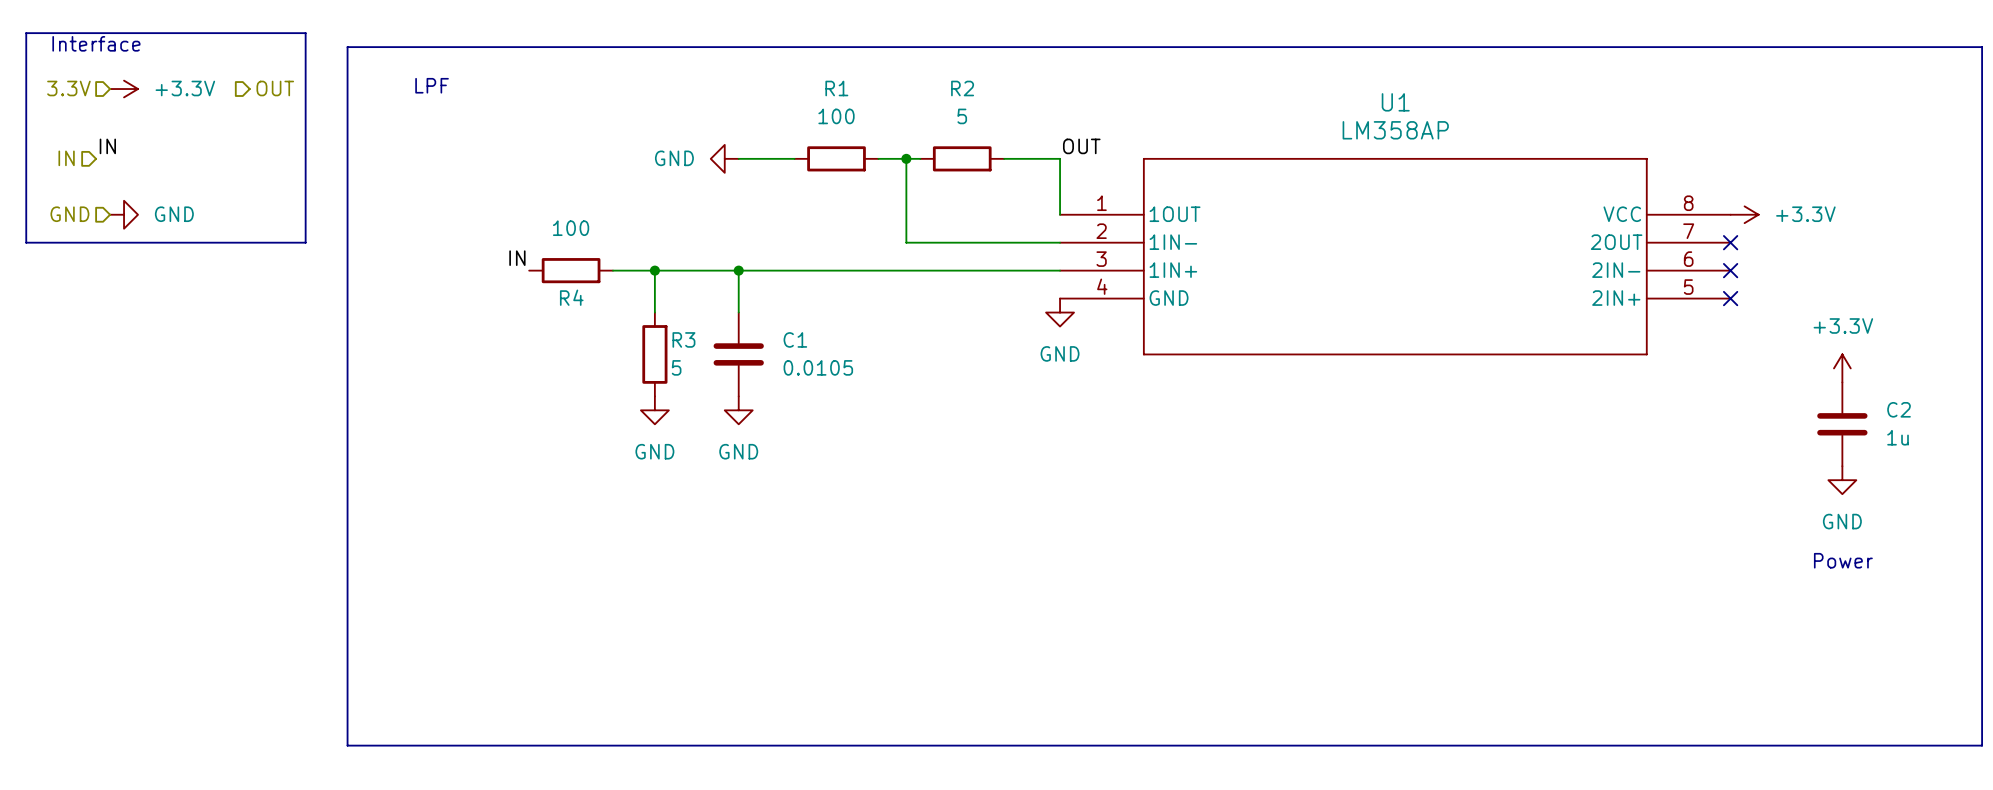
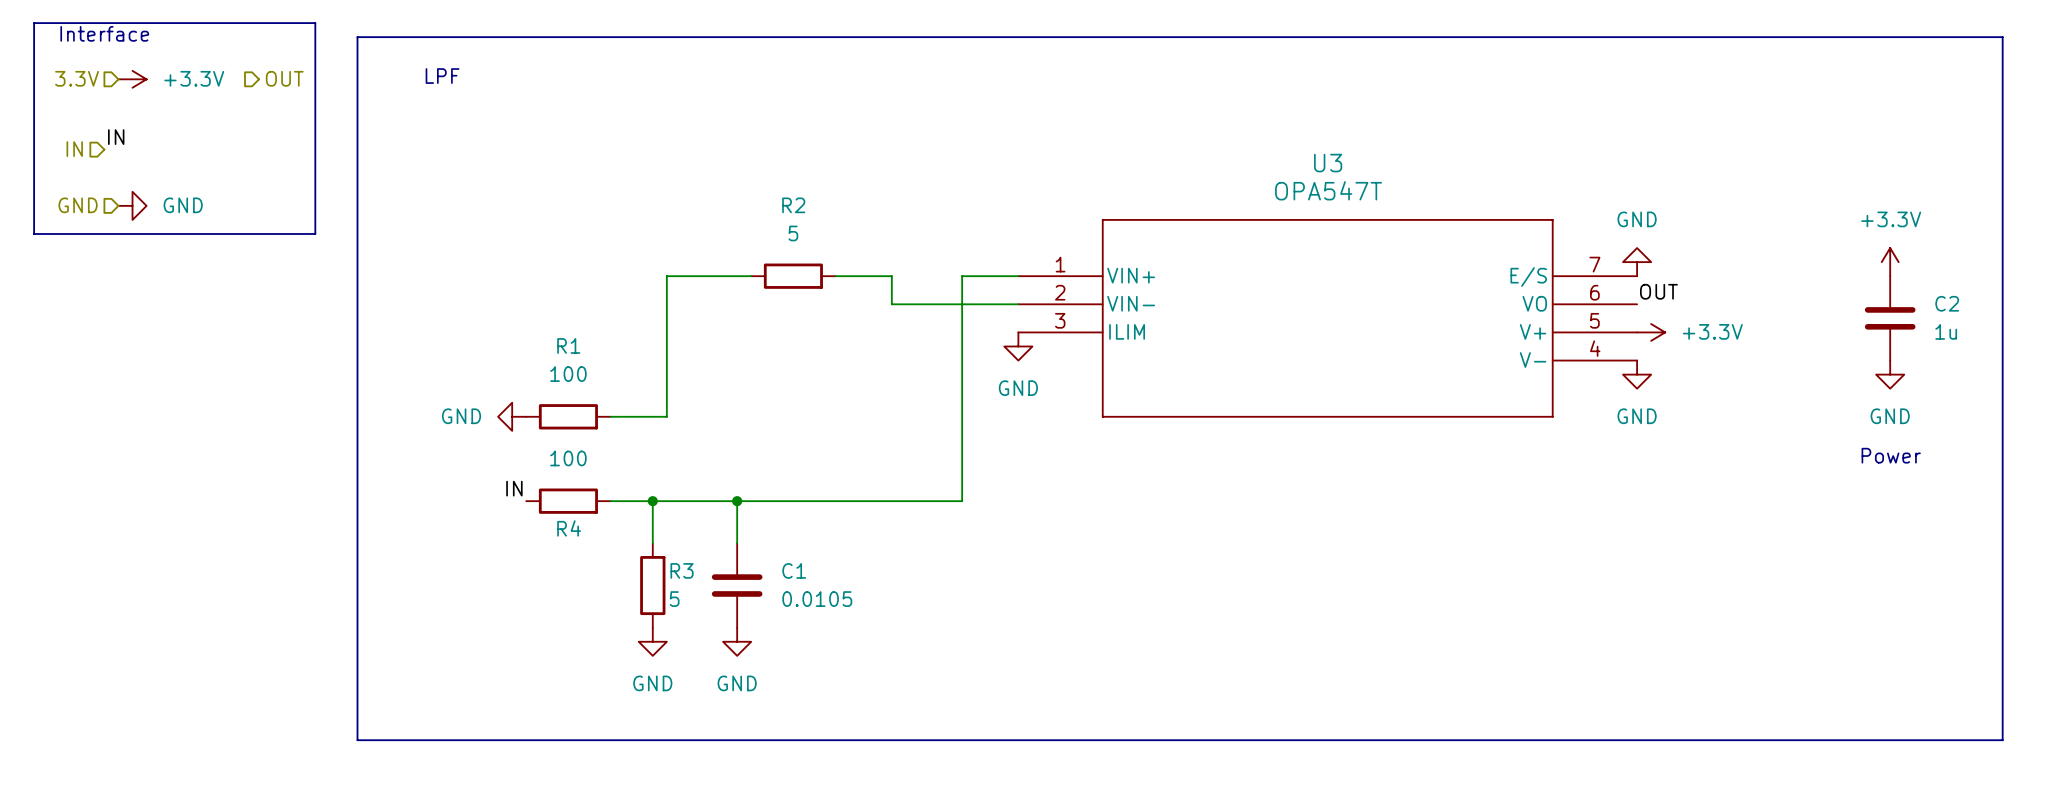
label: OUT (1081, 146) -> none
power symbol: GND (724, 158) -> none
wire: (738, 158) (794, 158) -> none
R1 position: (836, 158) -> (568, 416)
wire: (878, 158) (920, 158) -> none
wire: (906, 158) (906, 242) (1060, 242) -> none
junction: (906, 158) -> none
R2 position: (962, 158) -> (793, 276)
wire: (1004, 158) (1060, 158) (1060, 214) -> none
power symbol: +3.3V (1744, 214) -> none
no-connect mark: (1730, 242) -> none
U1: LM358AP (1395, 256) -> none
label position: IN (517, 258) -> IN (514, 488)
R4 position: (571, 270) -> (568, 501)
wire: (612, 270) (1060, 270) -> none
wire: (654, 270) (654, 284) -> (751, 276) (666, 276)
junction: (654, 270) -> none
wire: (738, 270) (738, 312) -> (737, 501) (737, 543)
junction: (738, 270) -> none
power symbol: none -> GND (1637, 262)
no-connect mark: (1730, 270) -> none
power symbol: none -> +3.3V (1890, 262)
wire: none -> (835, 276) (891, 276) (891, 304) (1018, 304)
wire: none -> (1018, 276) (962, 276) (962, 501) (610, 501)
no-connect mark: (1730, 298) -> none
label: none -> OUT (1658, 291)
wire: none -> (666, 304) (666, 416) (610, 416)
power symbol position: GND (1060, 312) -> GND (1018, 346)
U3: none -> OPA547T (1327, 318)
power symbol: none -> +3.3V (1651, 332)
R3 position: (654, 354) -> (652, 585)
C1 position: (738, 354) -> (737, 585)
power symbol: +3.3V (1842, 368) -> none
power symbol: none -> GND (1637, 374)
power symbol: GND (654, 410) -> none
power symbol: GND (738, 410) -> none
power symbol: none -> GND (512, 416)
C2 position: (1842, 424) -> (1890, 318)
power symbol position: GND (1842, 480) -> GND (1890, 374)
wire: none -> (652, 501) (652, 543)
junction: none -> (652, 501)
junction: none -> (737, 501)
text position: Power (1843, 560) -> Power (1891, 455)
power symbol: none -> GND (652, 641)
power symbol: none -> GND (737, 641)

